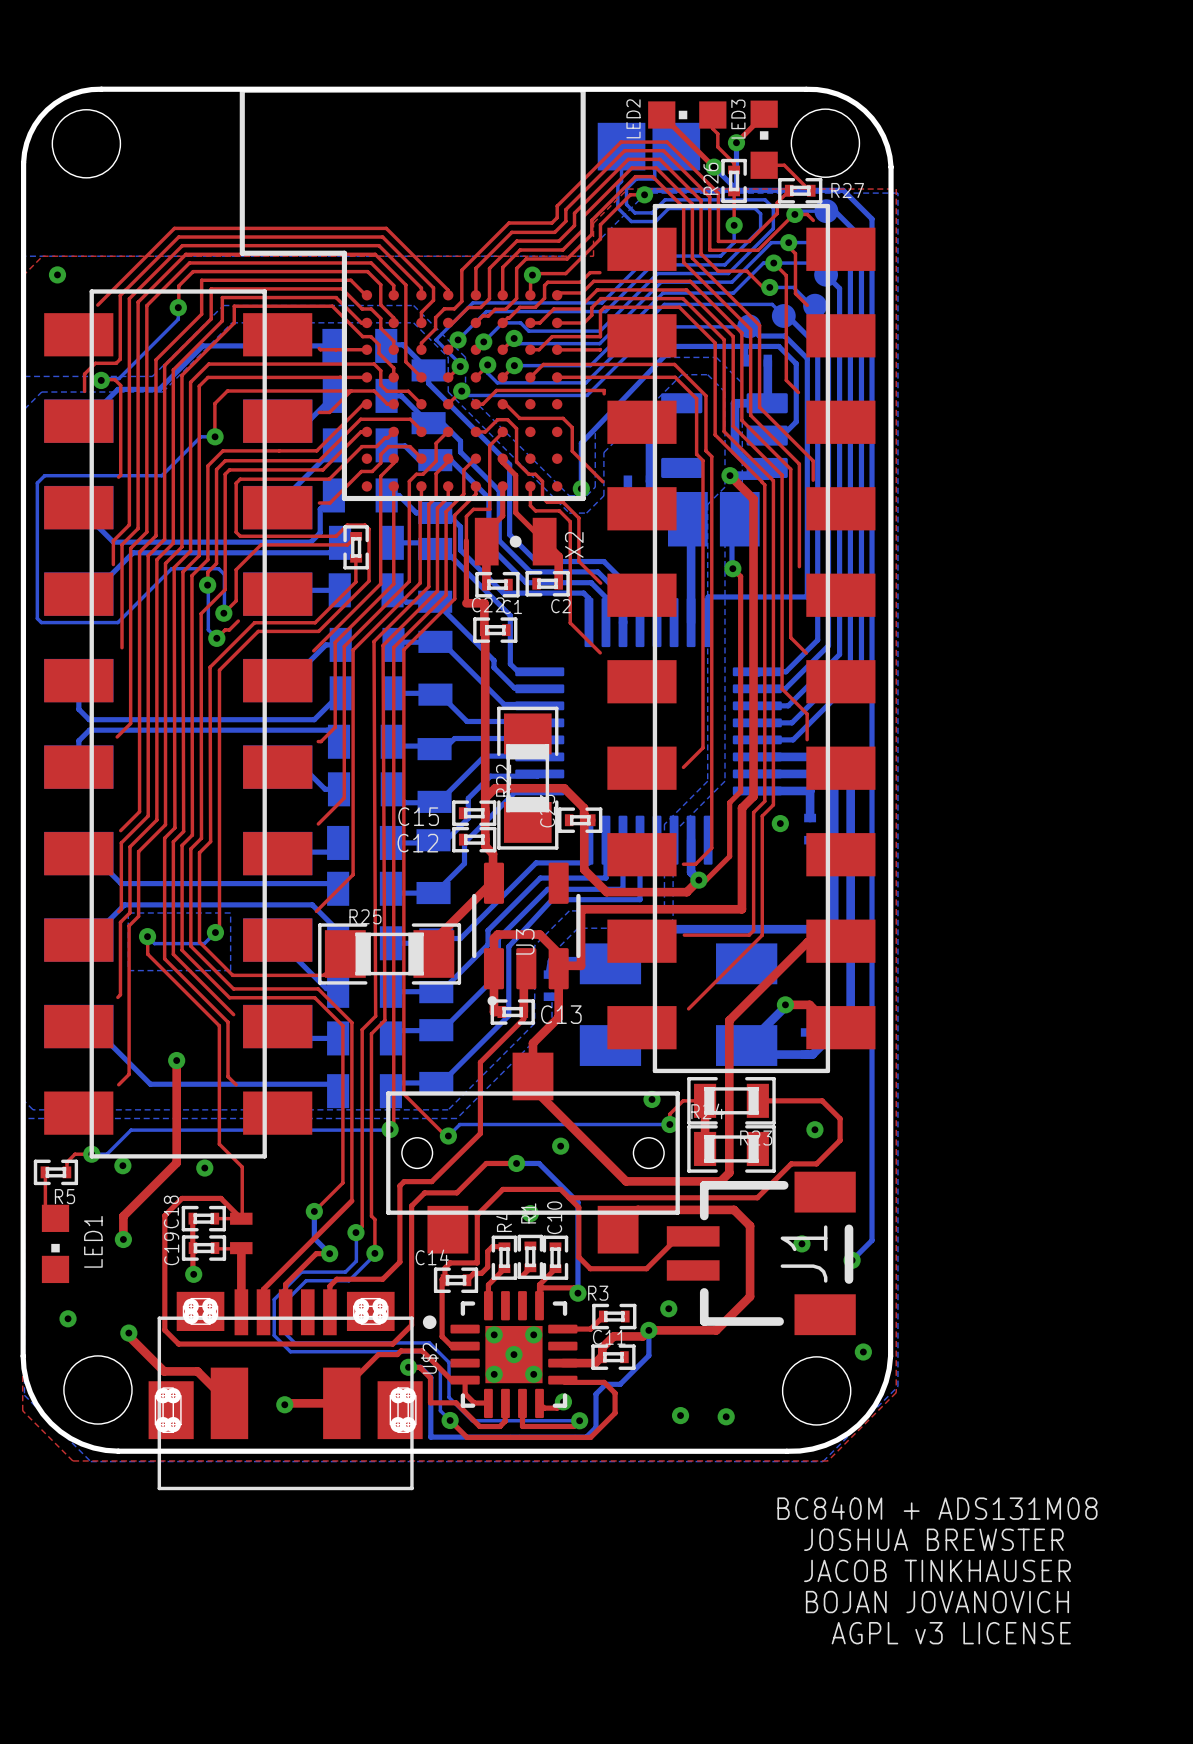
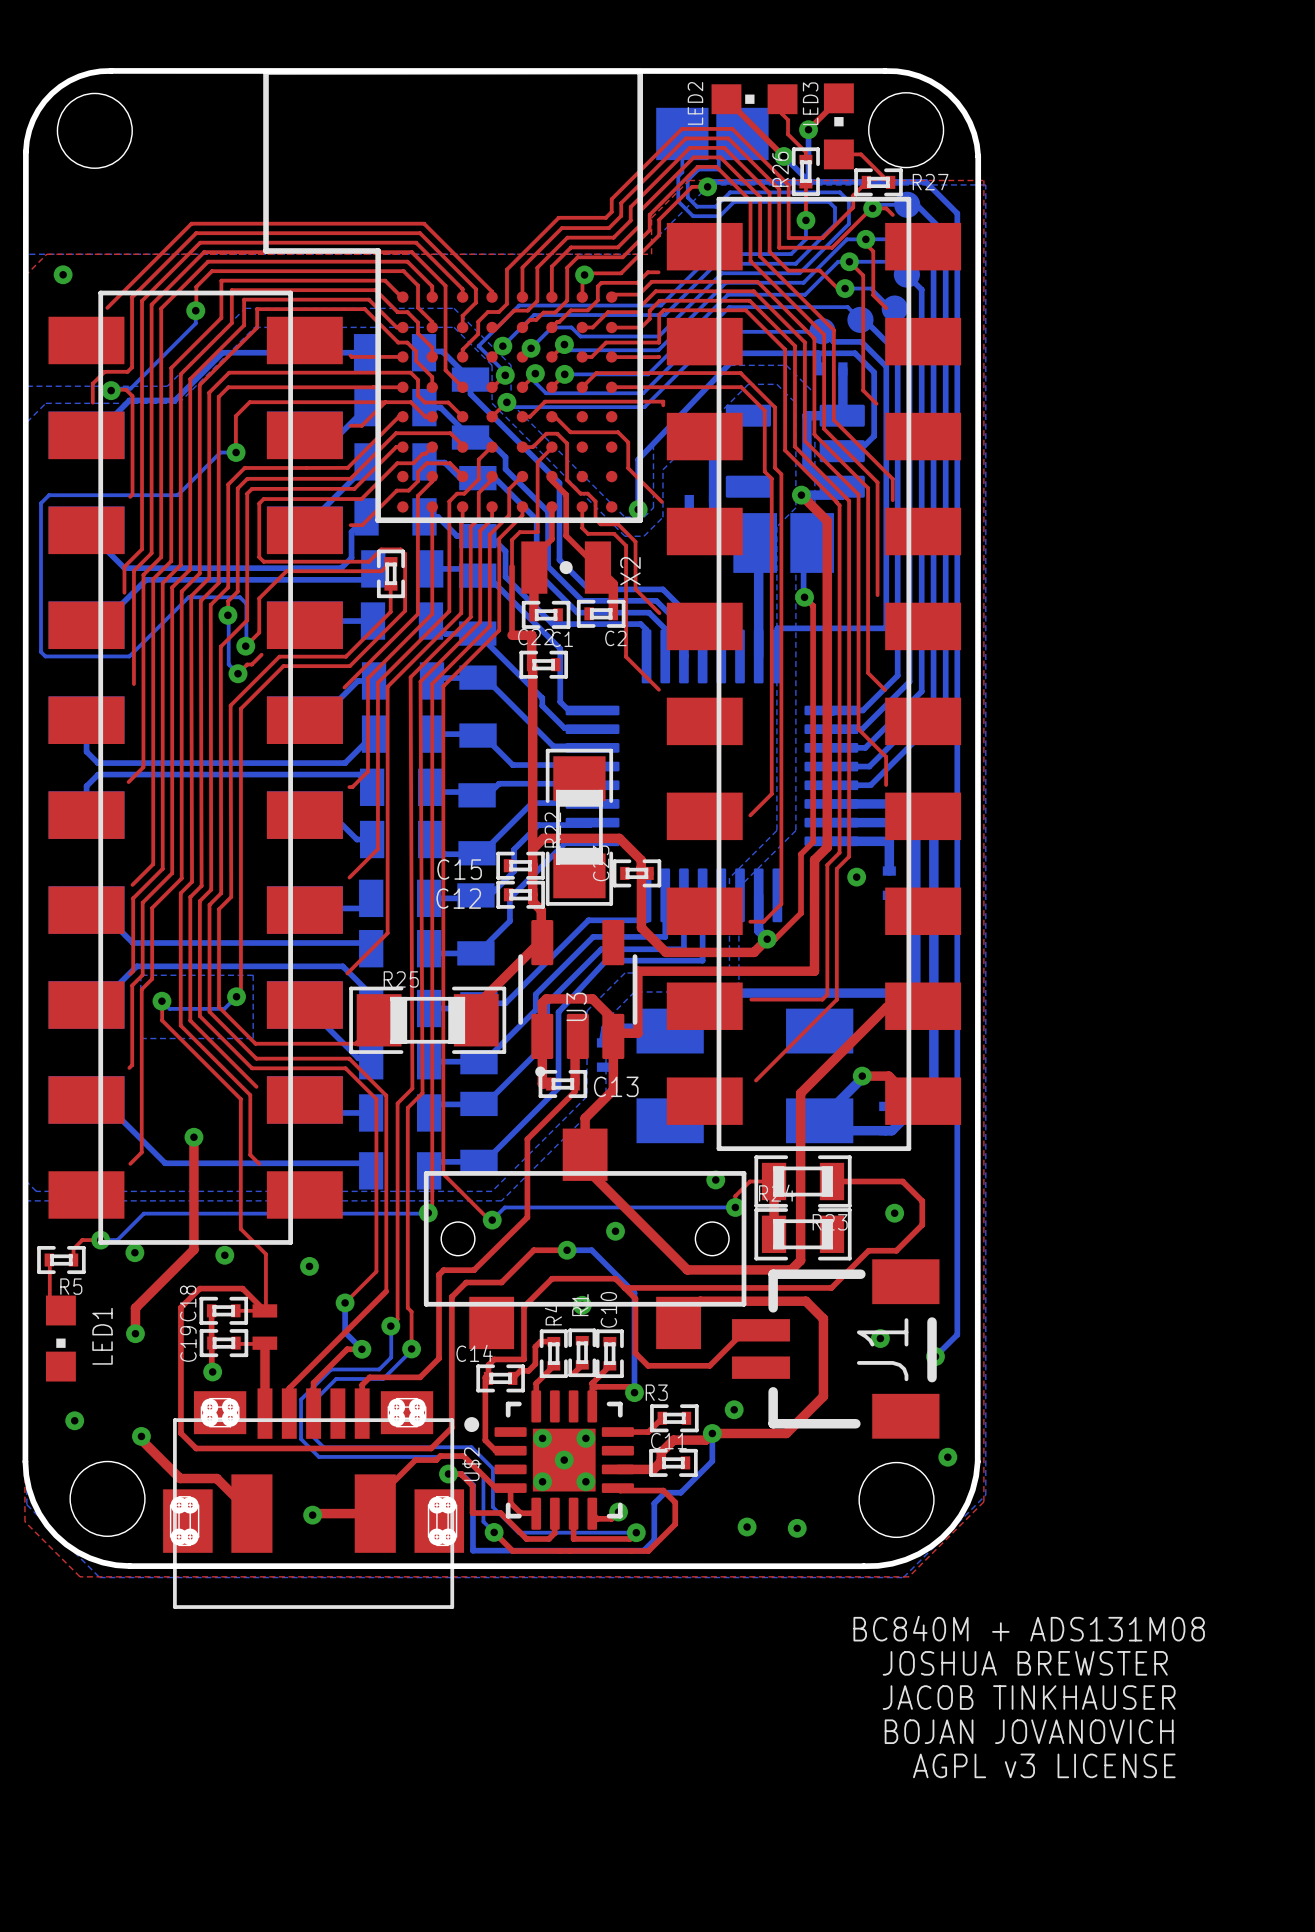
via: none -> (309, 1266)

